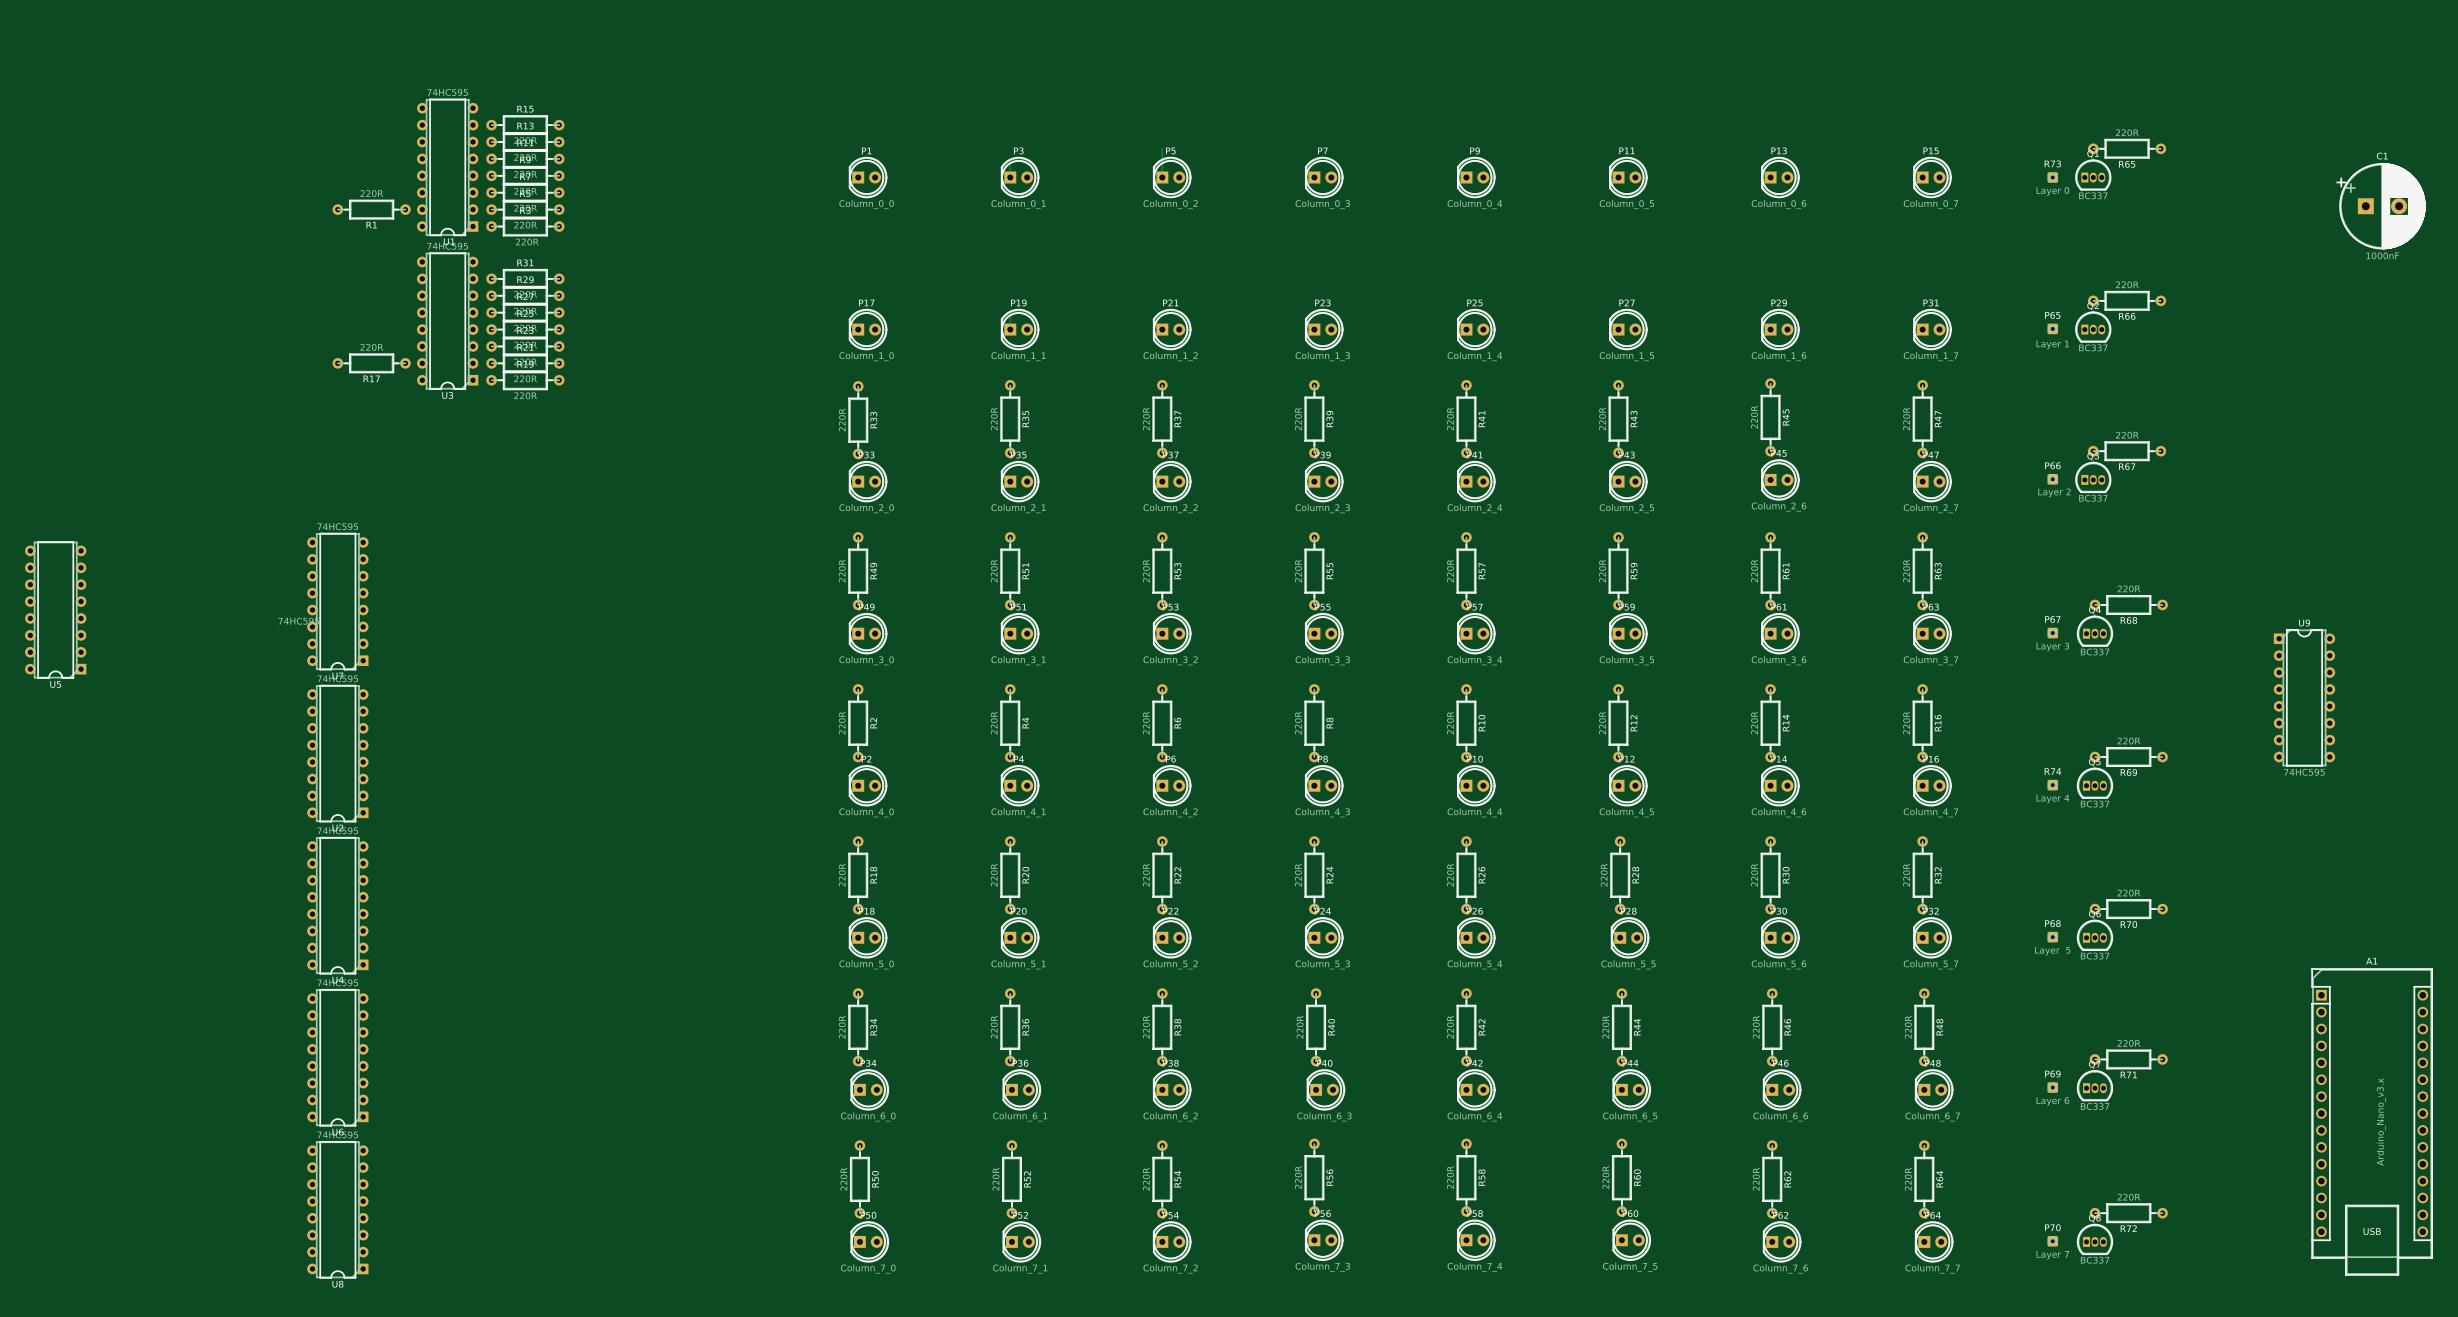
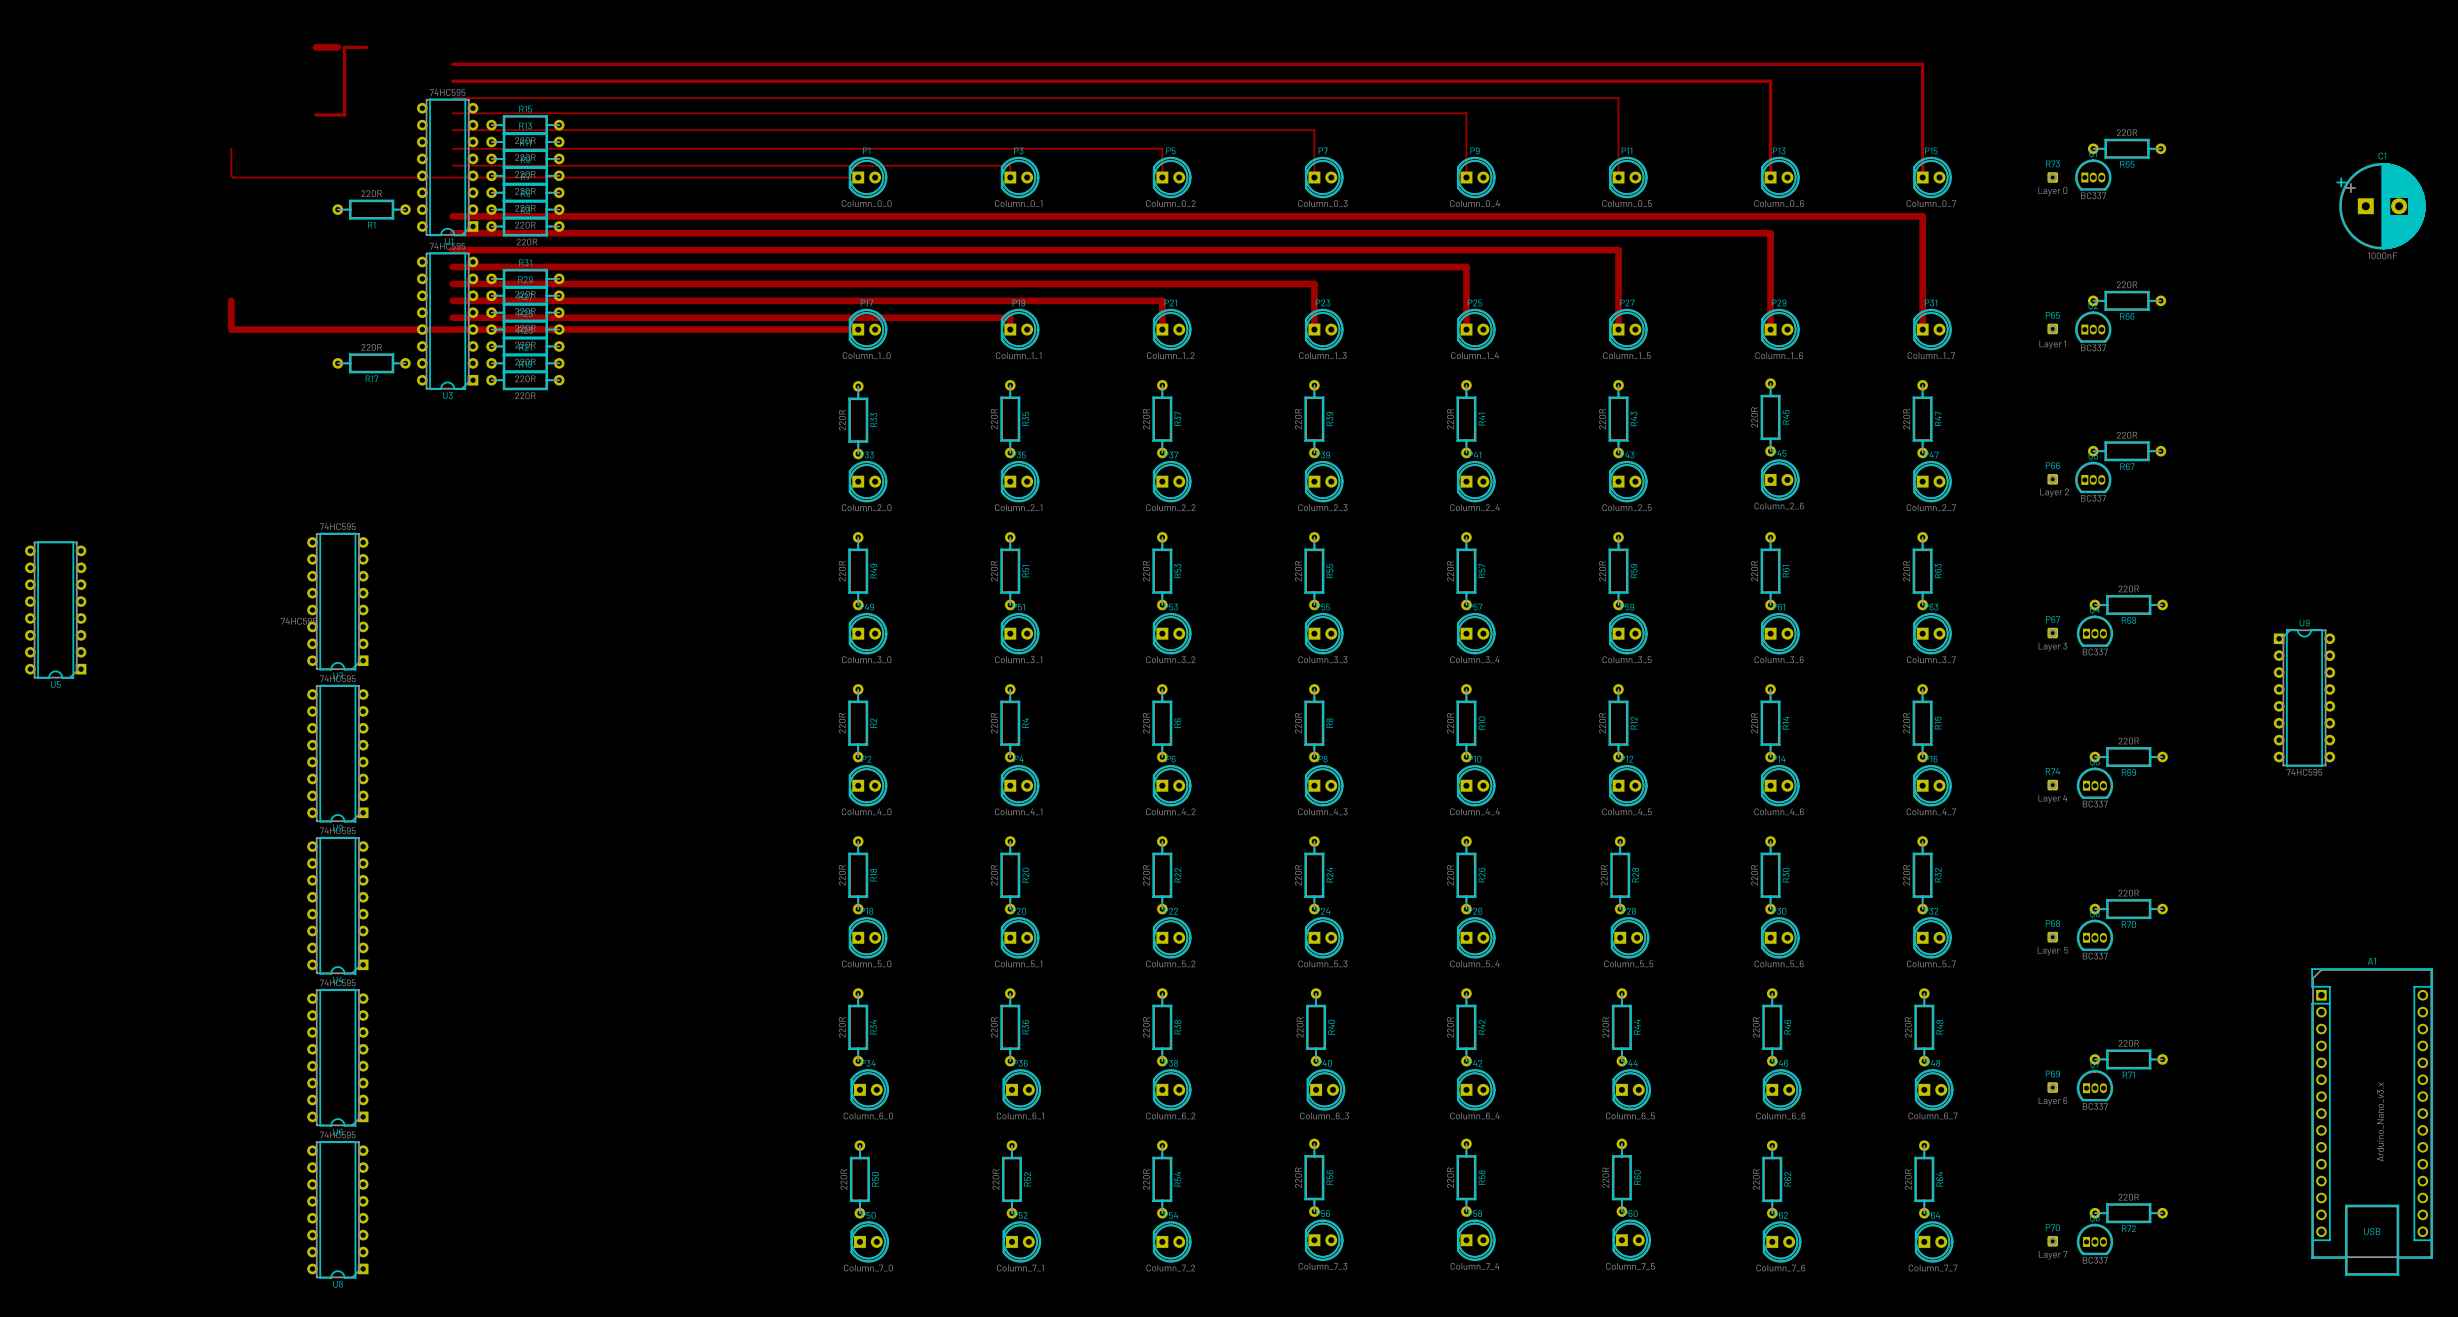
track: none -> (315, 47) (337, 47)
track: none -> (366, 47) (344, 47) (344, 114) (315, 114)
track: none -> (452, 64) (1922, 64) (1922, 177)
track: none -> (452, 81) (1770, 81) (1770, 177)
track: none -> (452, 98) (1618, 98) (1618, 177)
track: none -> (452, 113) (1466, 113) (1466, 177)
track: none -> (452, 130) (1314, 130) (1314, 177)
track: none -> (231, 148) (231, 175) (233, 177) (858, 177)
track: none -> (452, 148) (1162, 148)
track: none -> (452, 165) (1010, 165)
track: none -> (452, 216) (1922, 216) (1922, 329)
track: none -> (452, 233) (1770, 233) (1770, 329)
track: none -> (452, 250) (1618, 250) (1618, 329)
track: none -> (452, 267) (1466, 267) (1466, 329)
track: none -> (452, 283) (1314, 283) (1314, 329)
track: none -> (231, 300) (231, 329) (858, 329)
track: none -> (452, 300) (1162, 300) (1162, 329)
track: none -> (452, 317) (1010, 317) (1010, 329)

